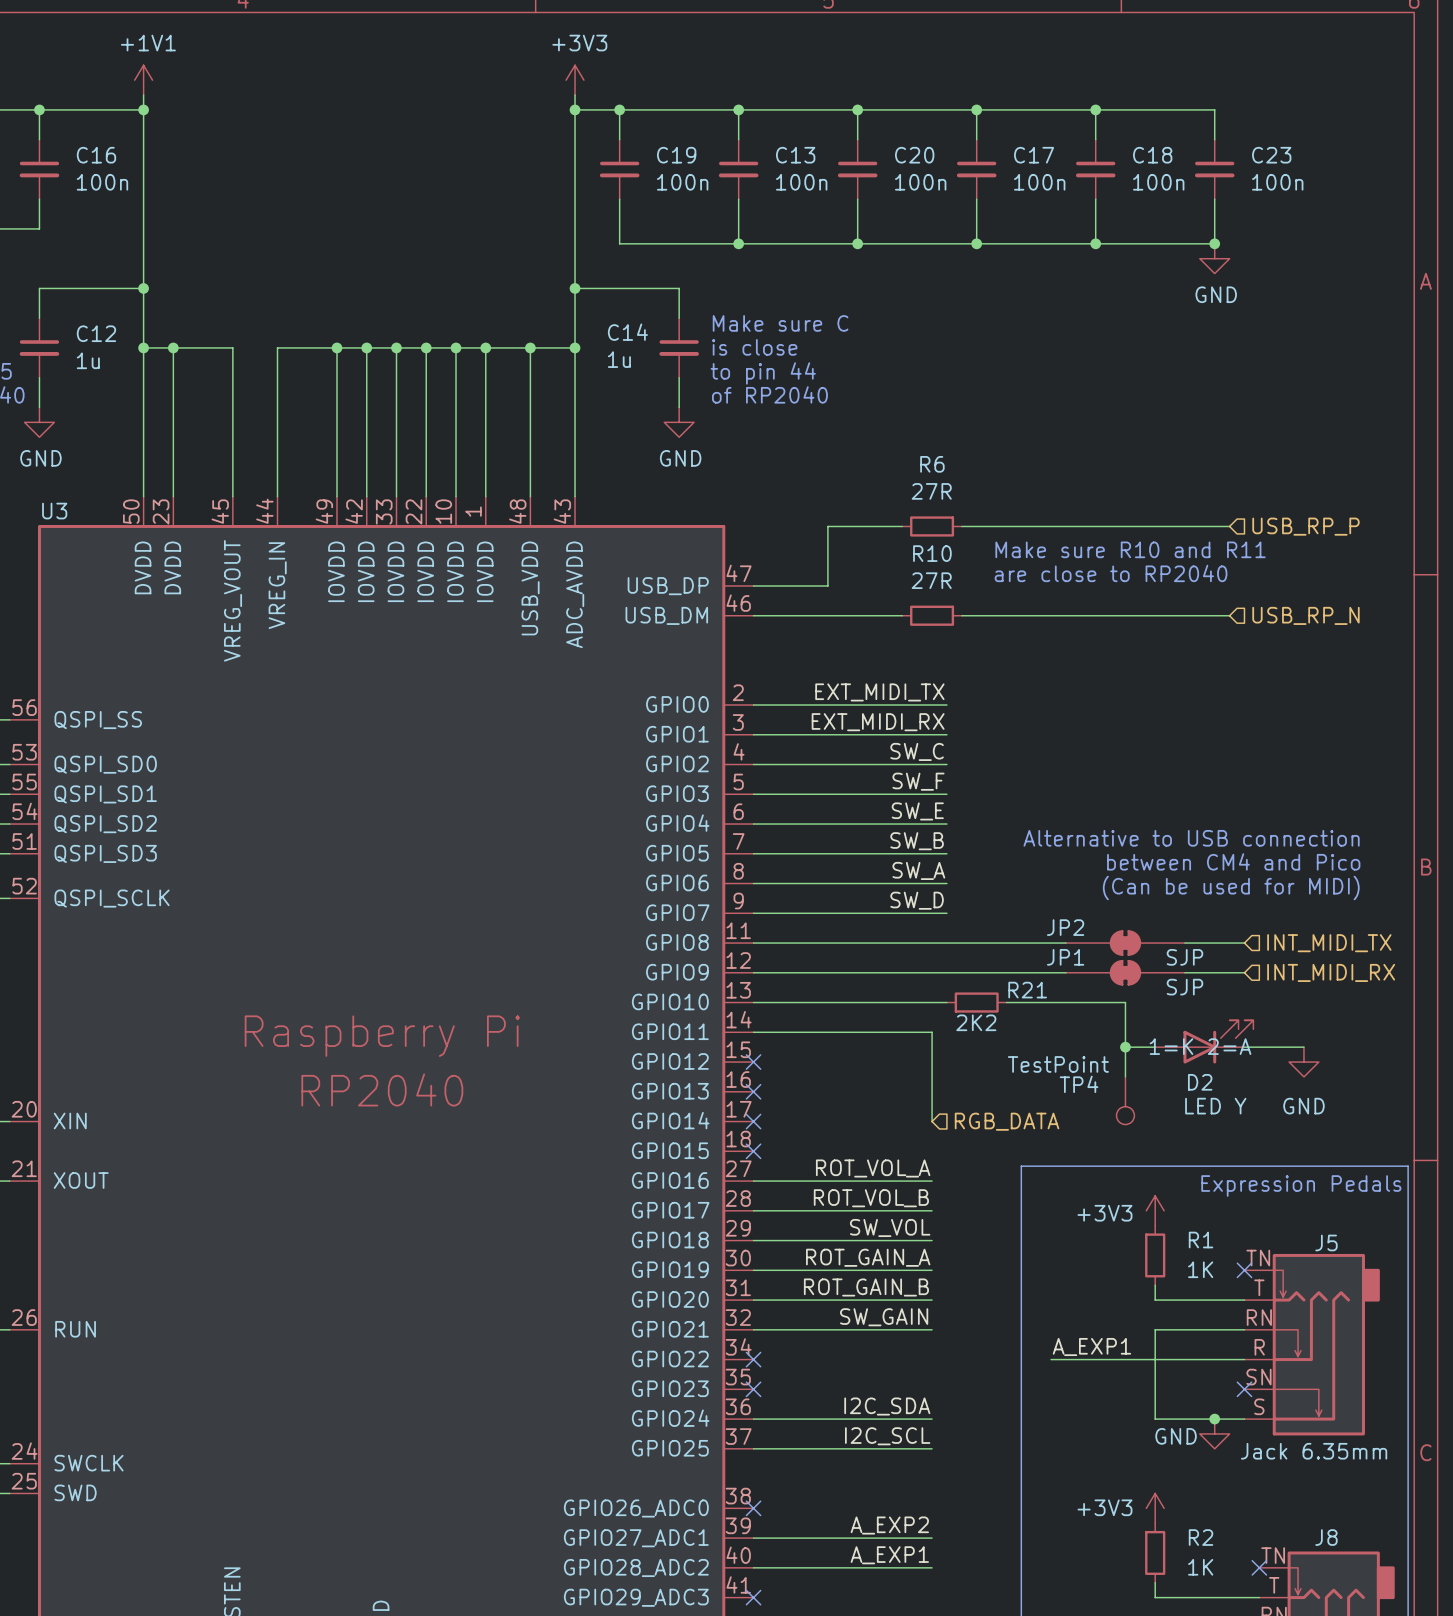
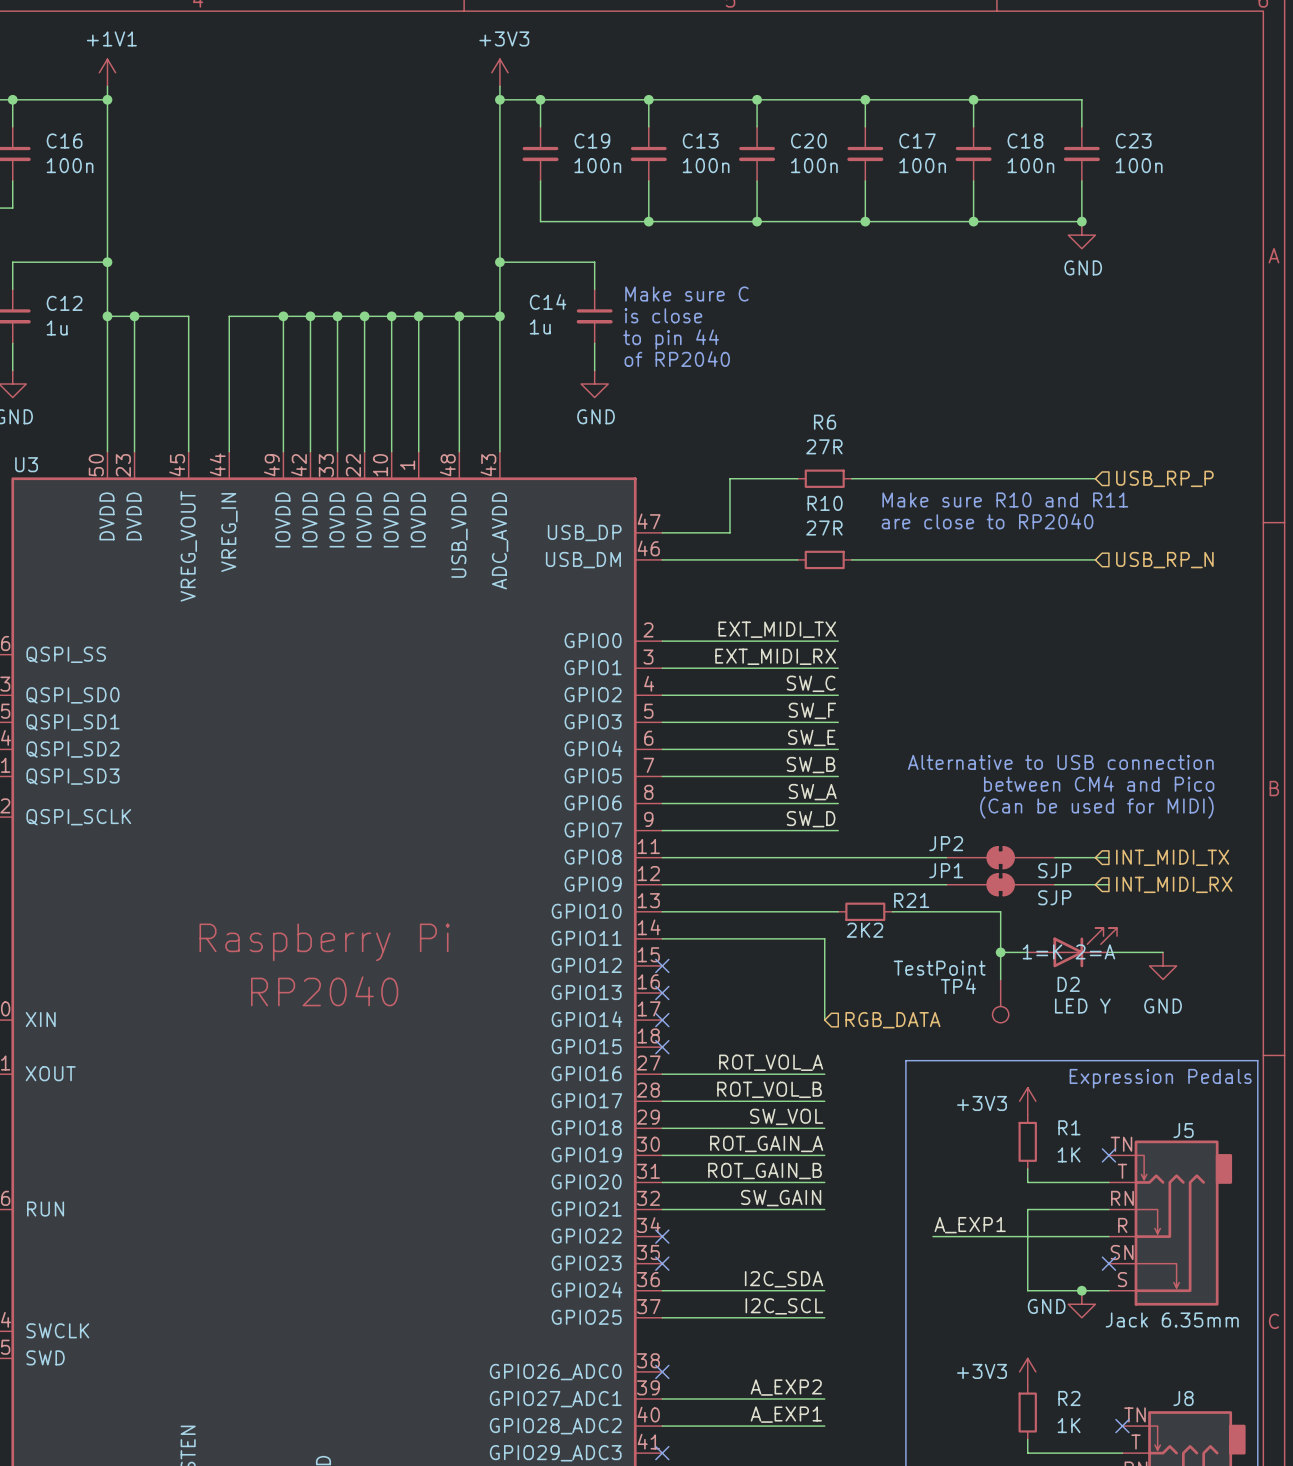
hierarchical label position: INT_MIDI_TX (1329, 943) -> INT_MIDI_TX (1172, 857)
hierarchical label position: INT_MIDI_RX (1331, 972) -> INT_MIDI_RX (1174, 884)

